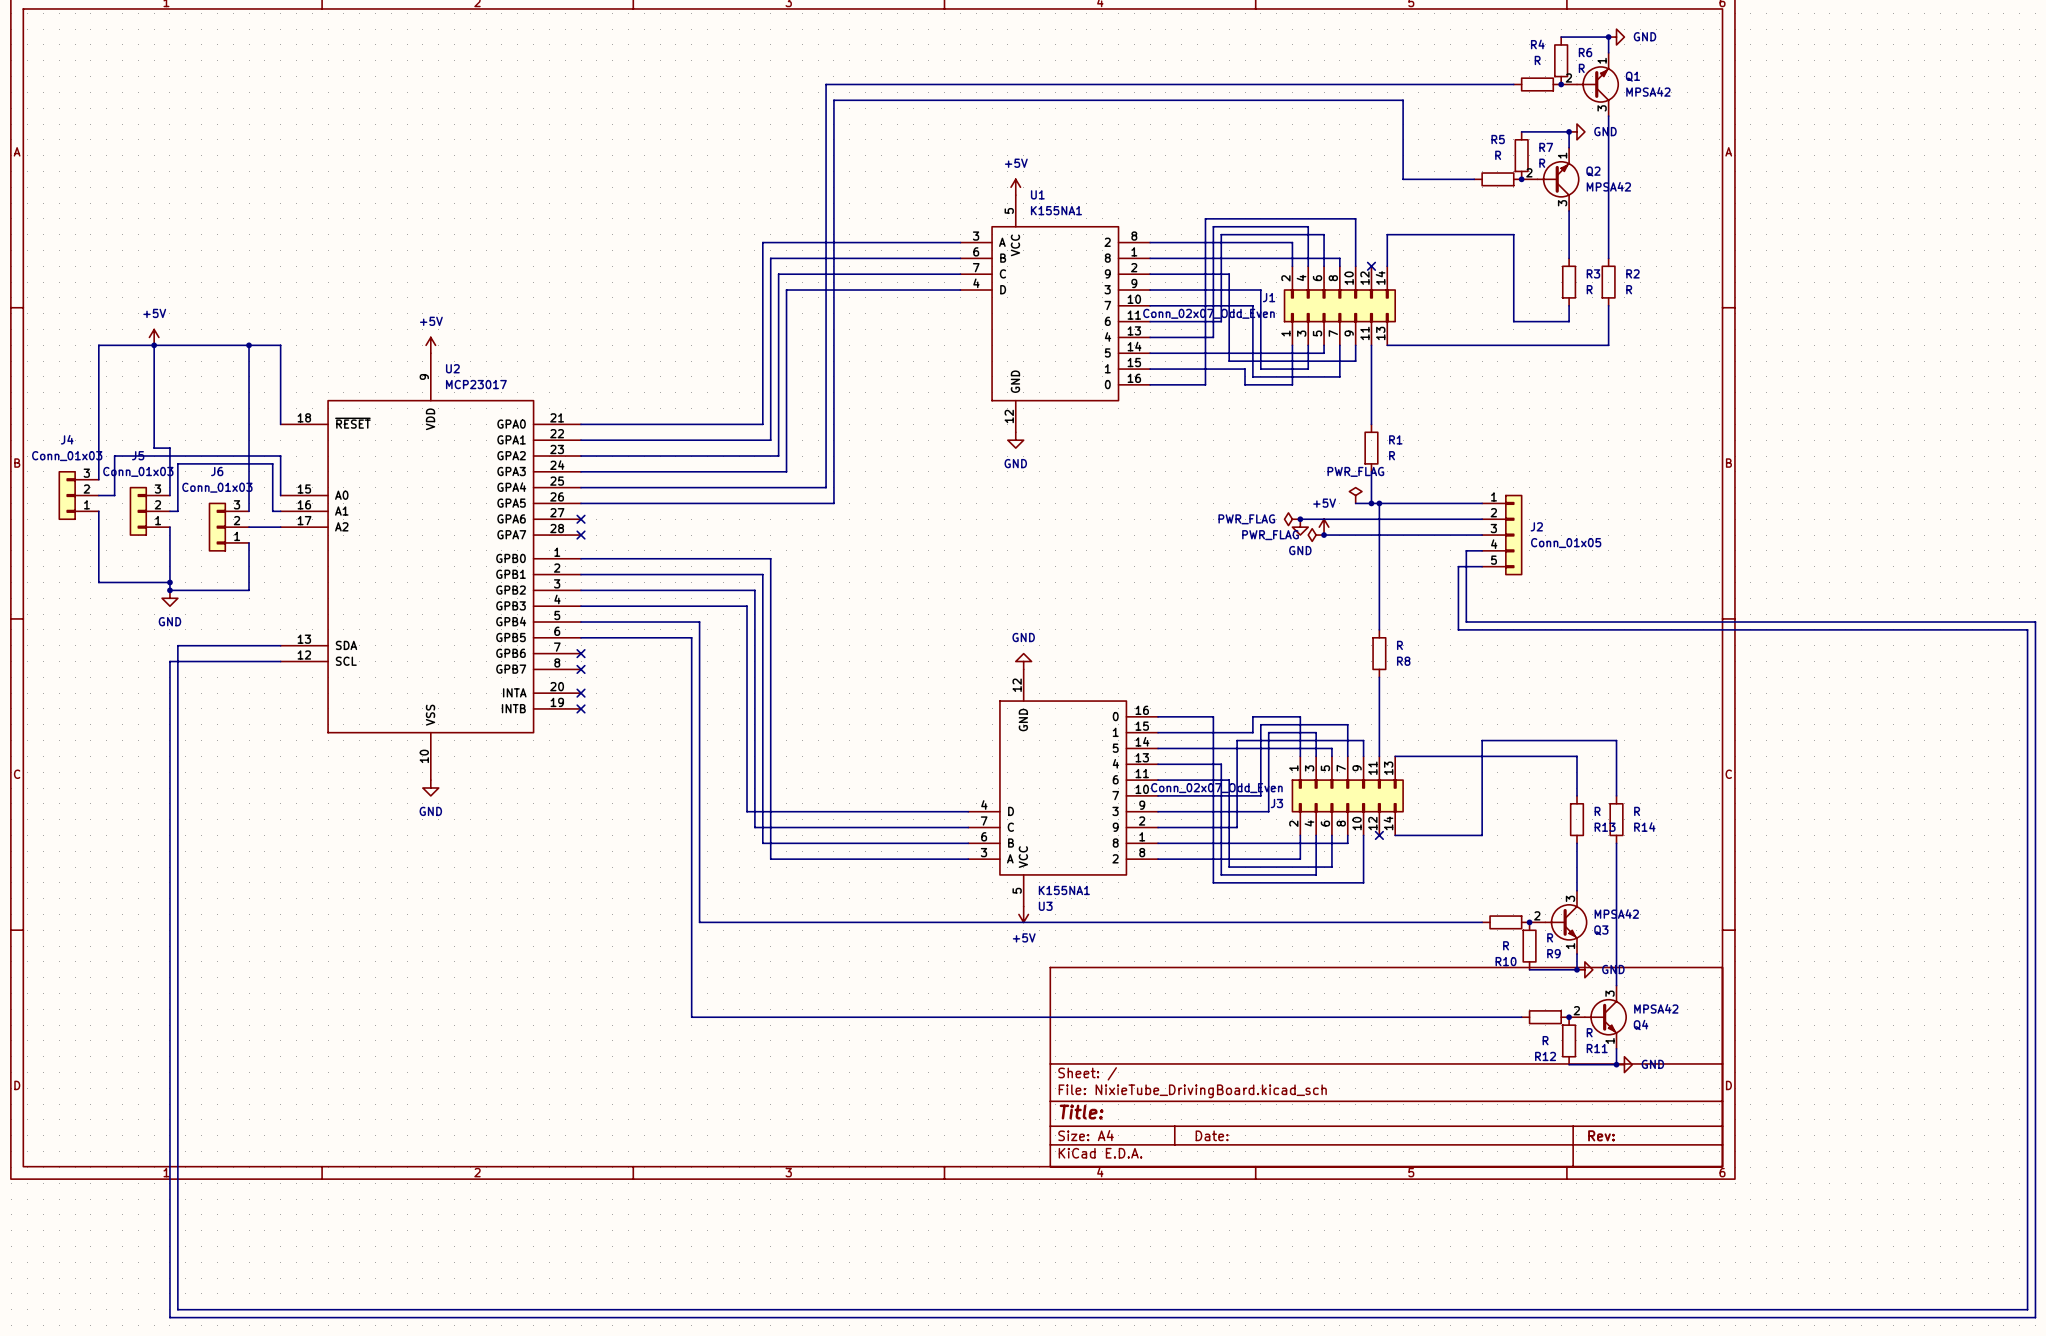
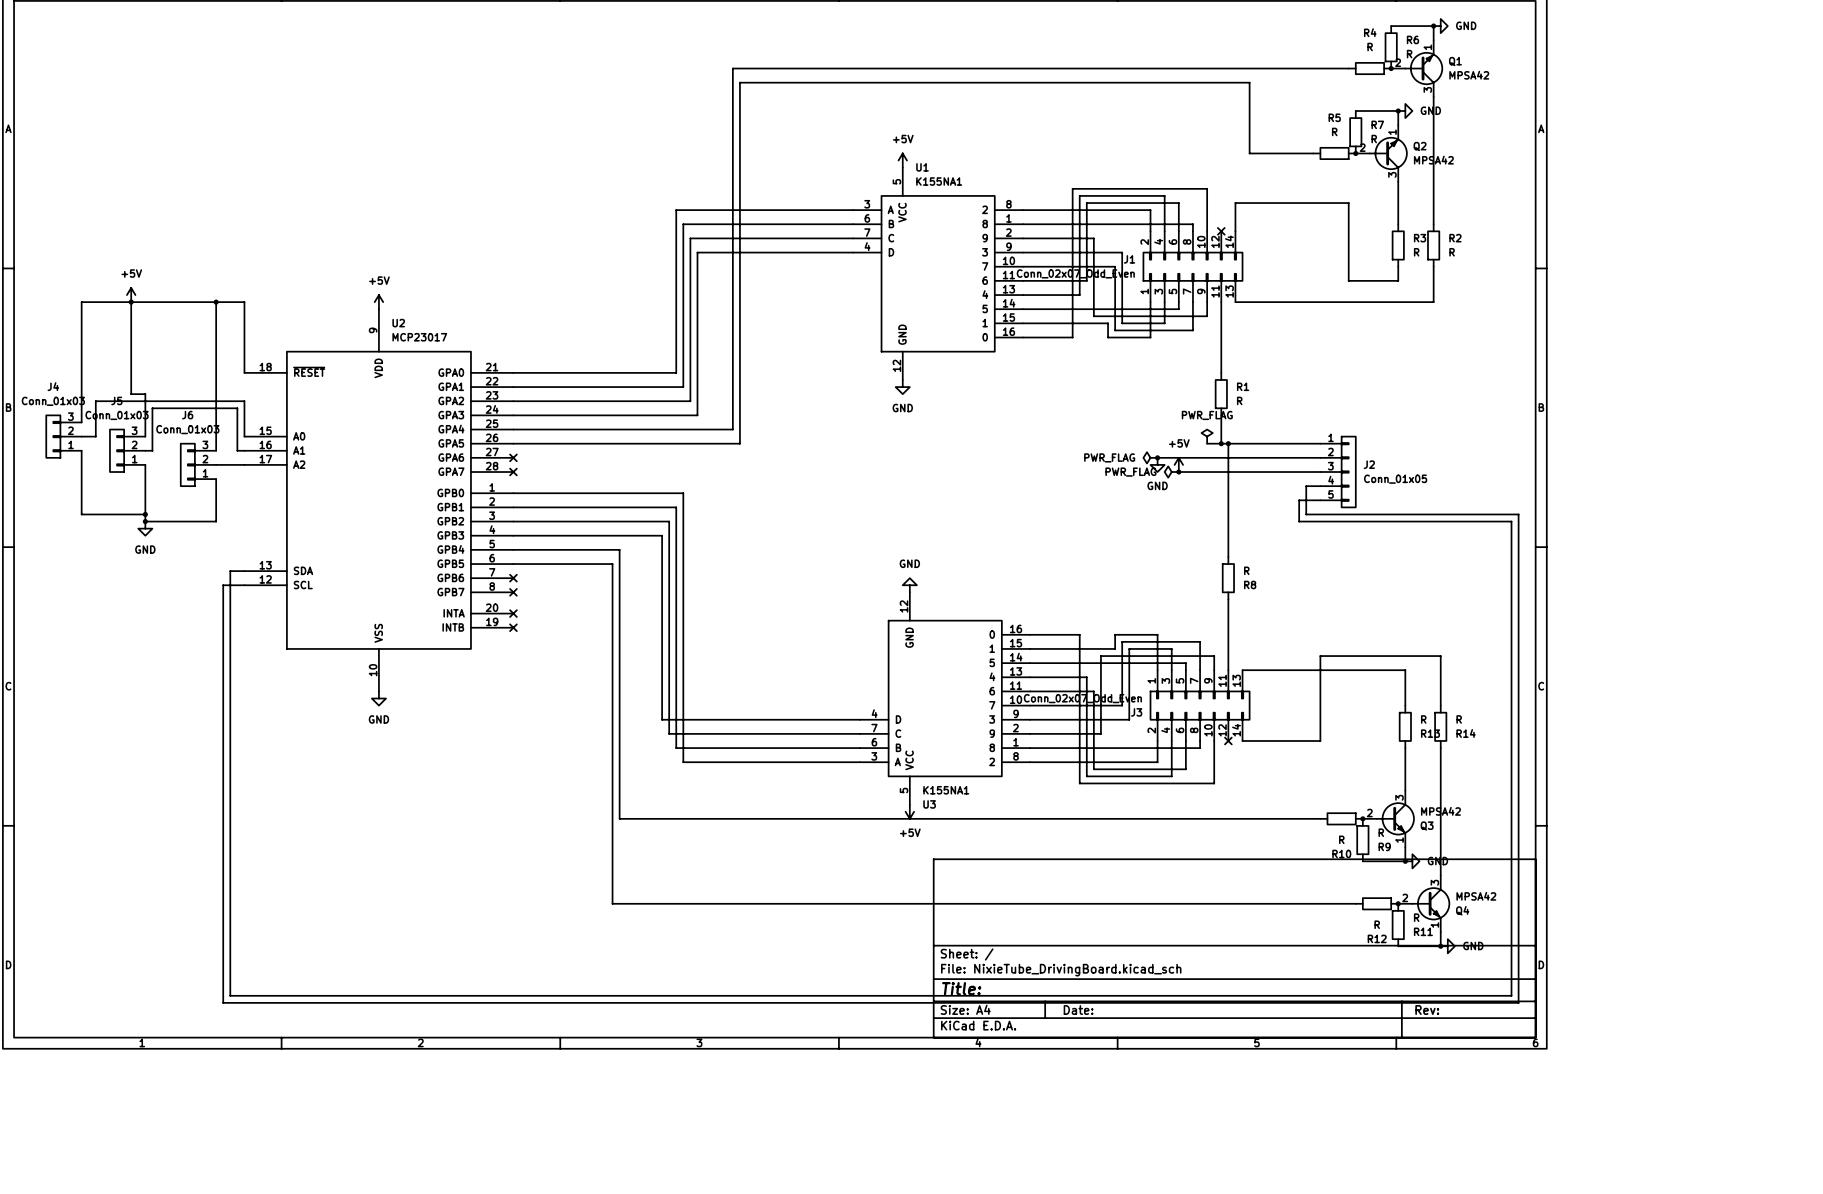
wire: (1466, 582) (1466, 622) (2035, 622) (2035, 1317) (169, 1317) (169, 661) (256, 661) -> (1306, 514) (1518, 514) (1518, 1002) (223, 1002) (223, 585)
wire: (1458, 590) (1458, 629) (2027, 629) (2027, 1309) (177, 1309) (177, 645) (264, 645) -> (1299, 521) (1511, 521) (1511, 995) (230, 995) (230, 571)

